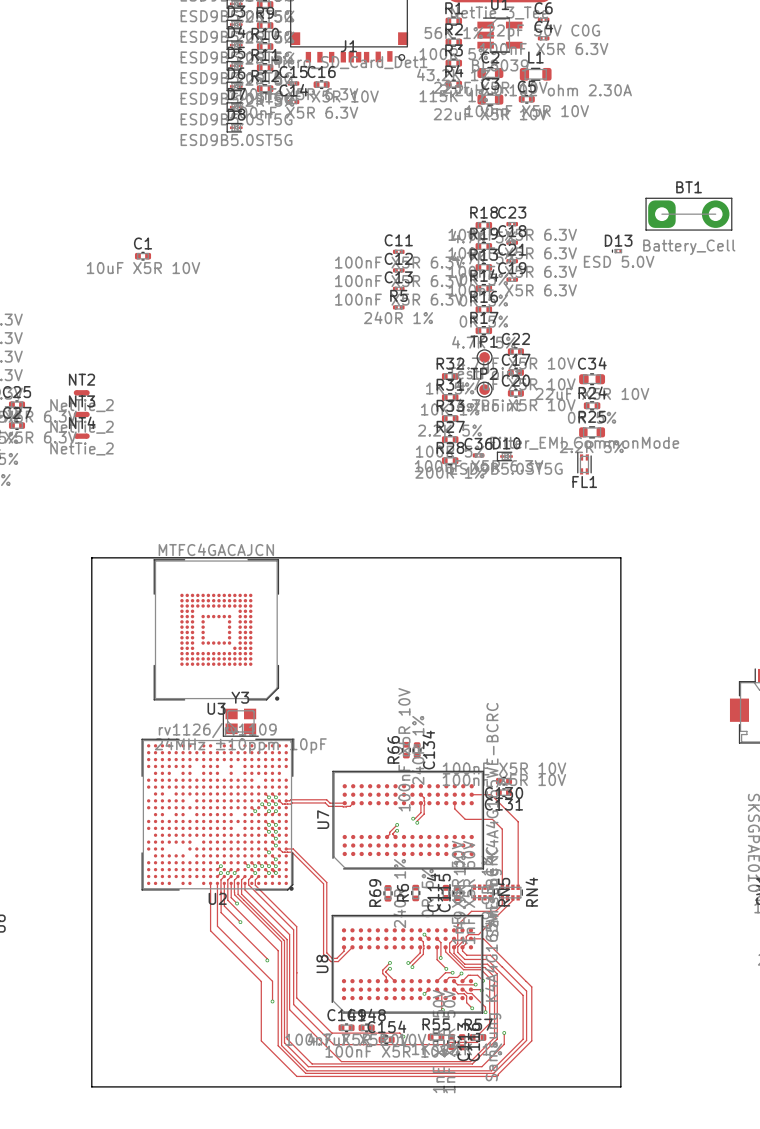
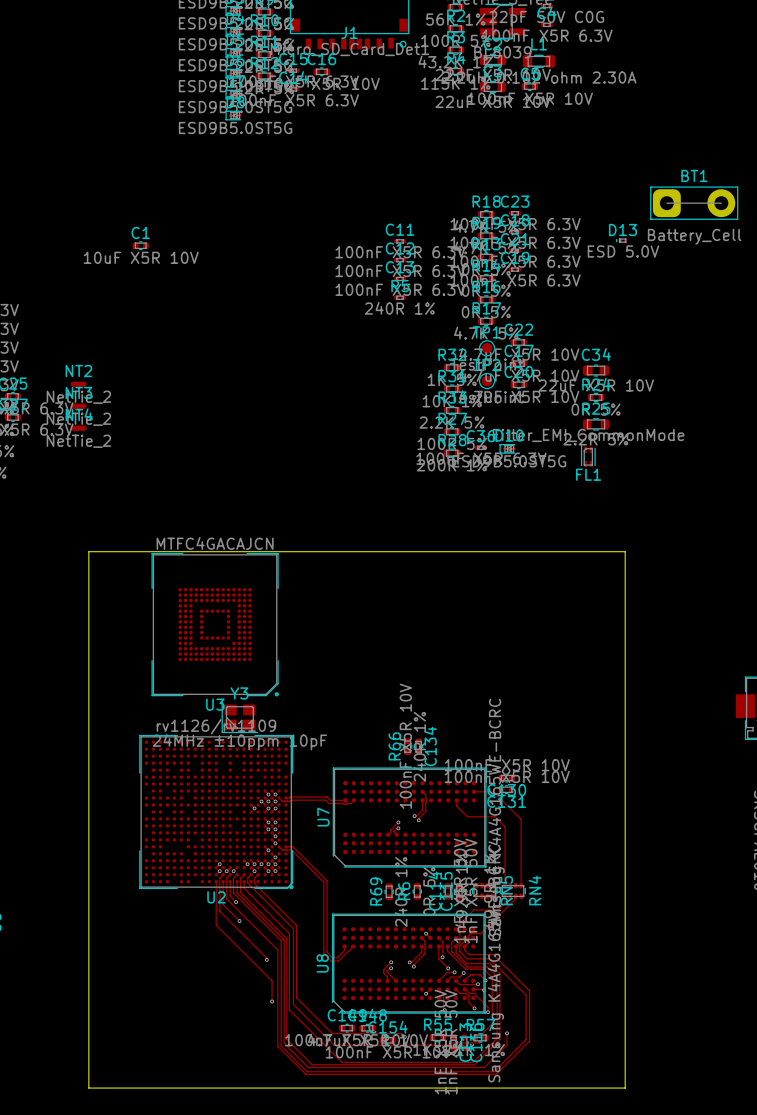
track: (210, 883) (210, 930) (261, 981) (261, 1040) (296, 1076) (497, 1076) (531, 1040) (531, 986) (526, 981) -> none
track: (470, 938) (483, 938) (526, 981) -> none

